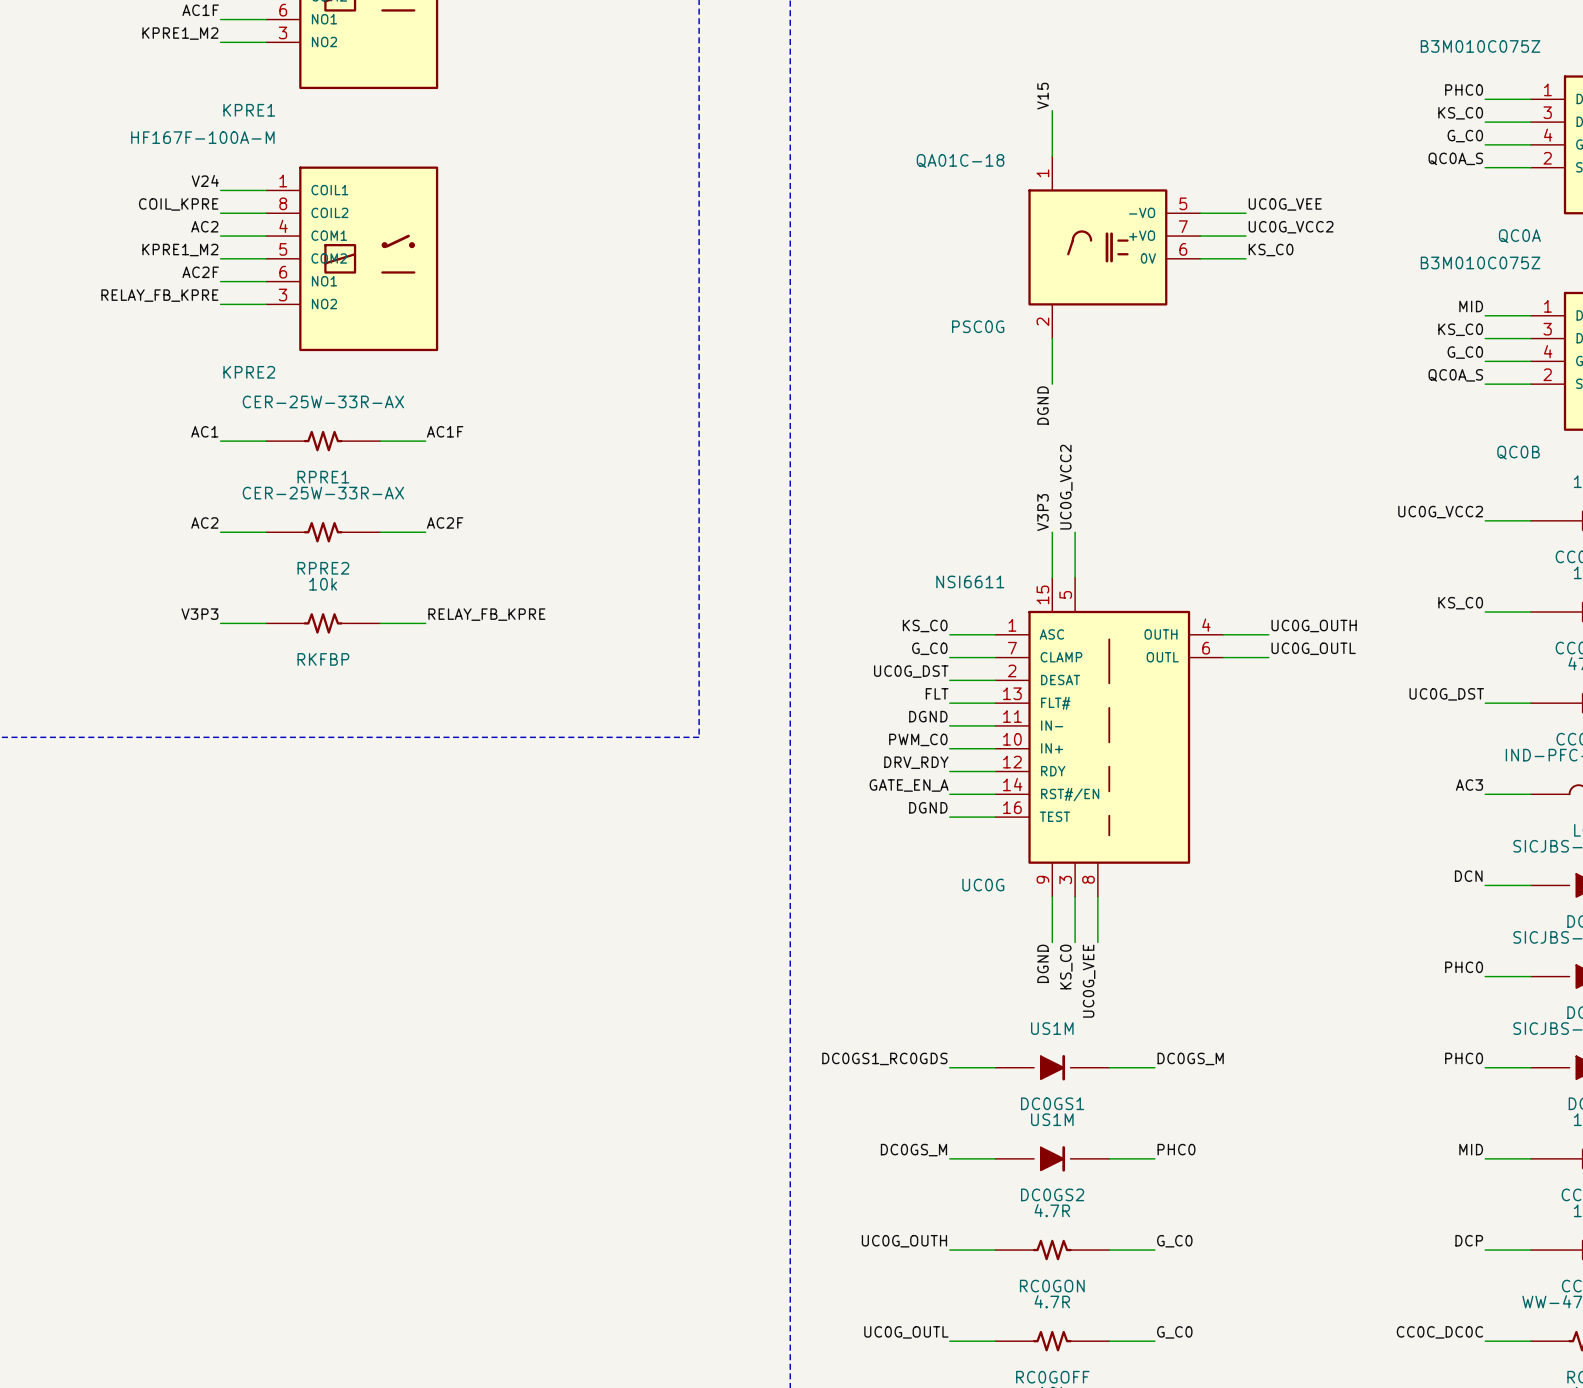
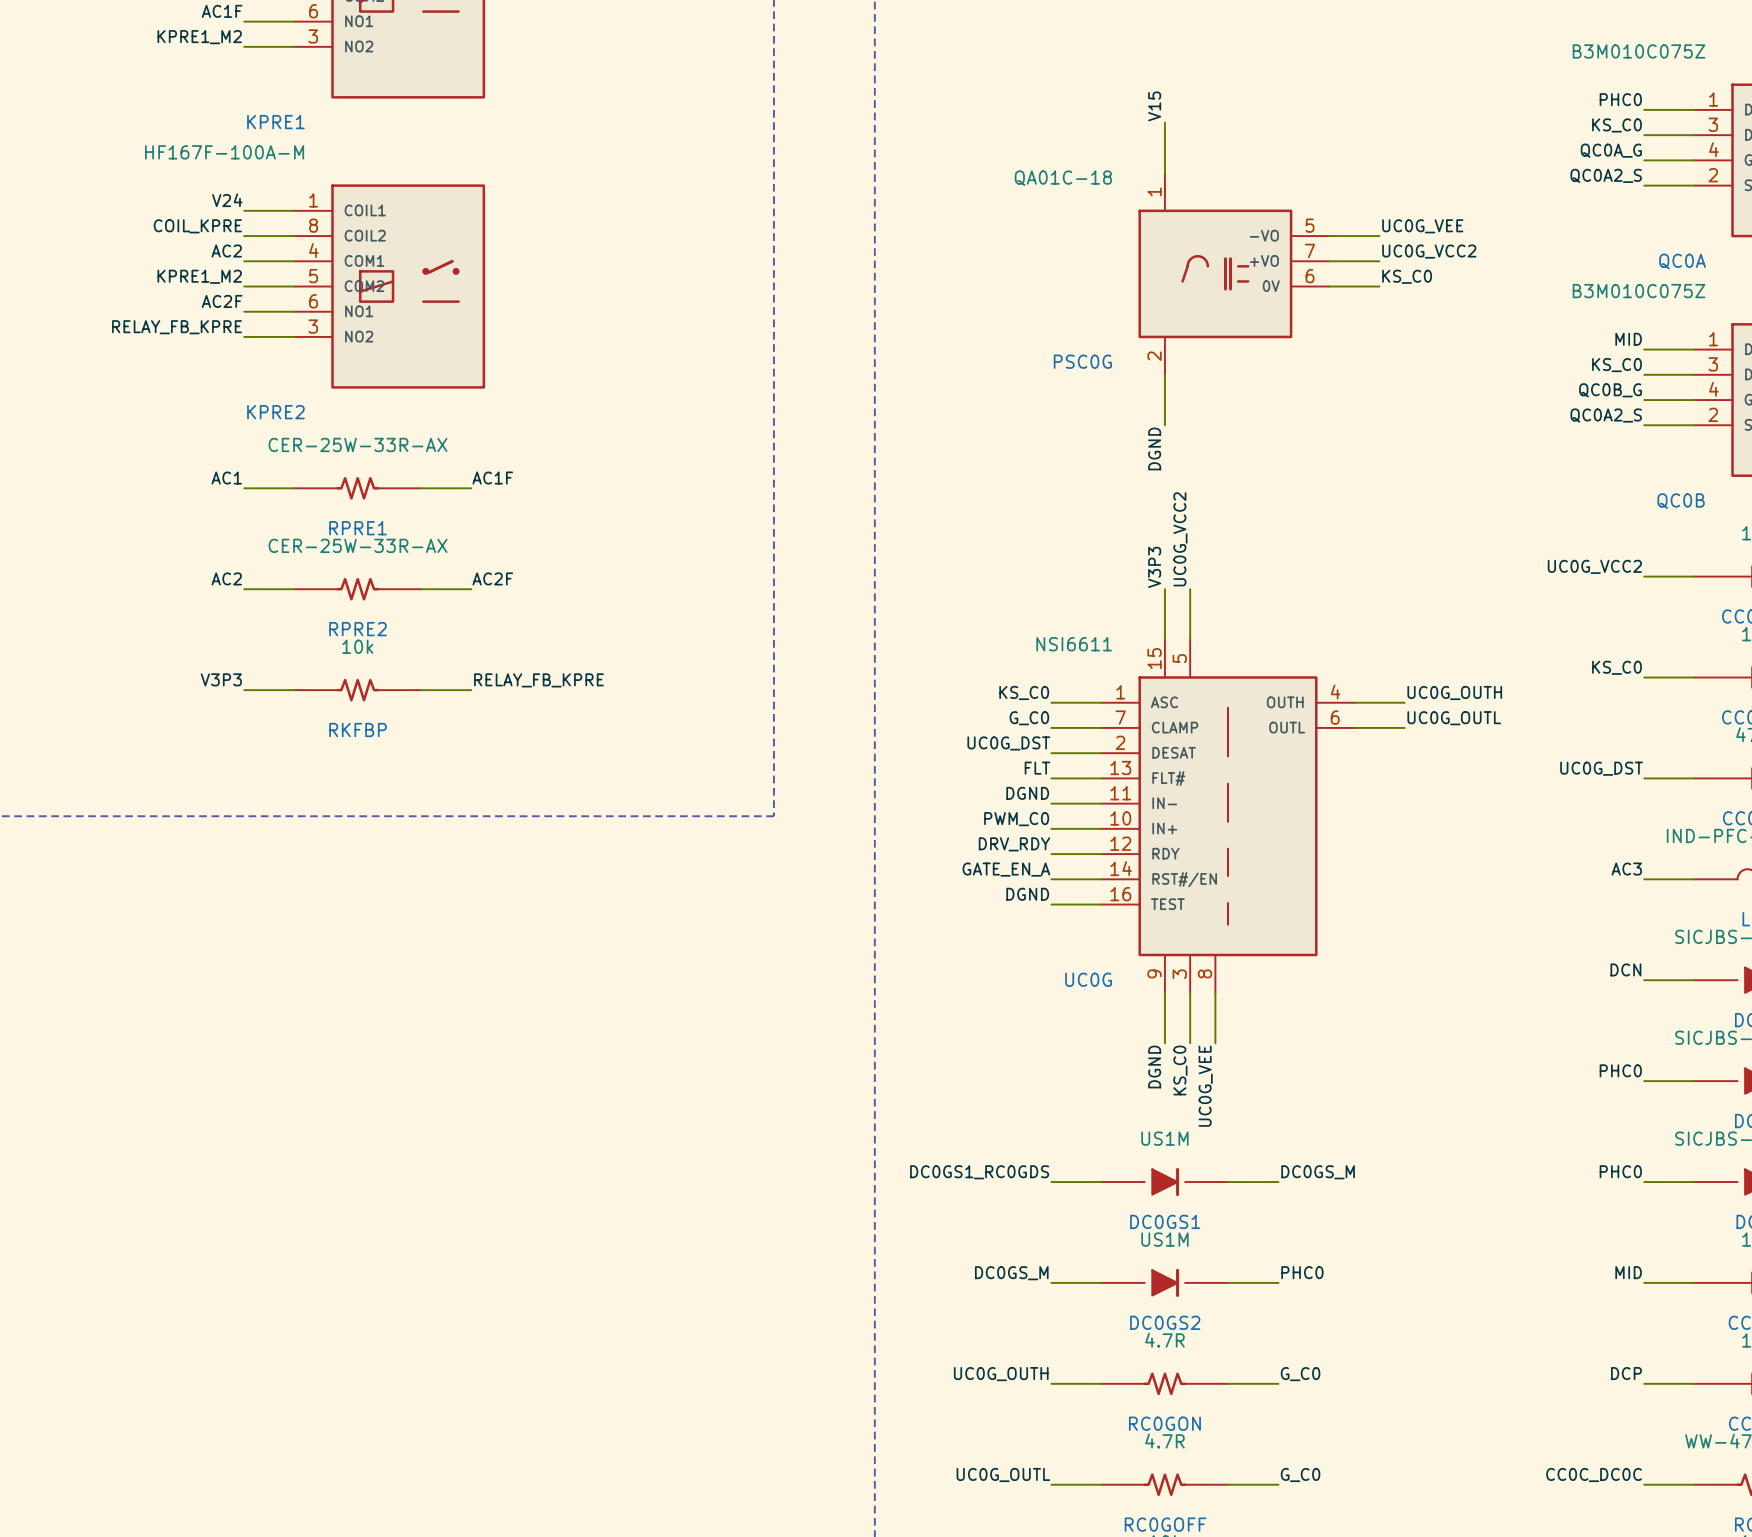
label: G_C0 (1465, 136) -> QC0A_G (1611, 150)
label: QC0A_S (1455, 158) -> QC0A2_S (1606, 175)
label: G_C0 (1465, 352) -> QC0B_G (1610, 390)
label: QC0A_S (1455, 375) -> QC0A2_S (1606, 415)

